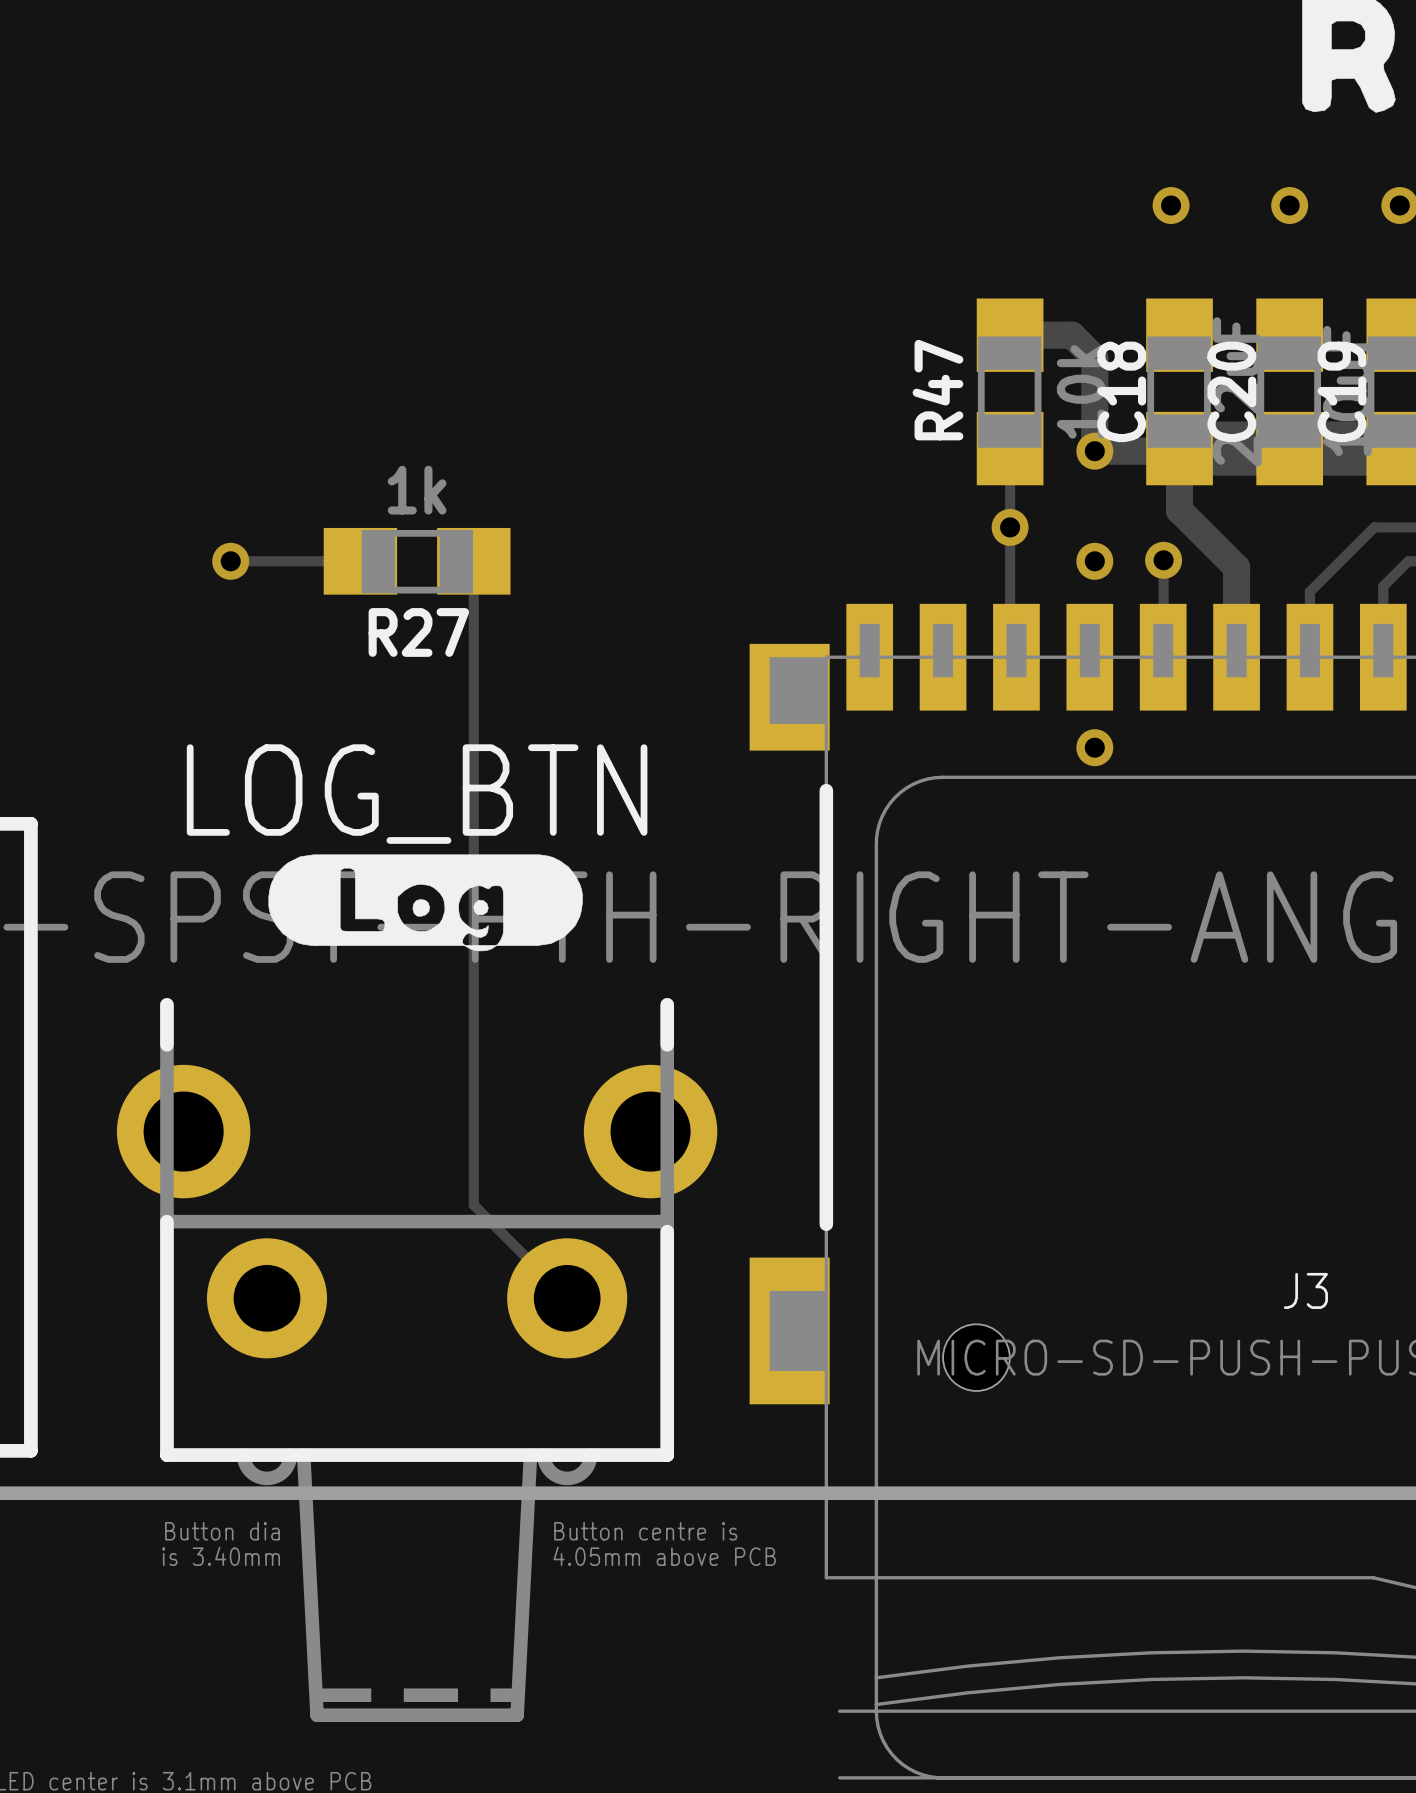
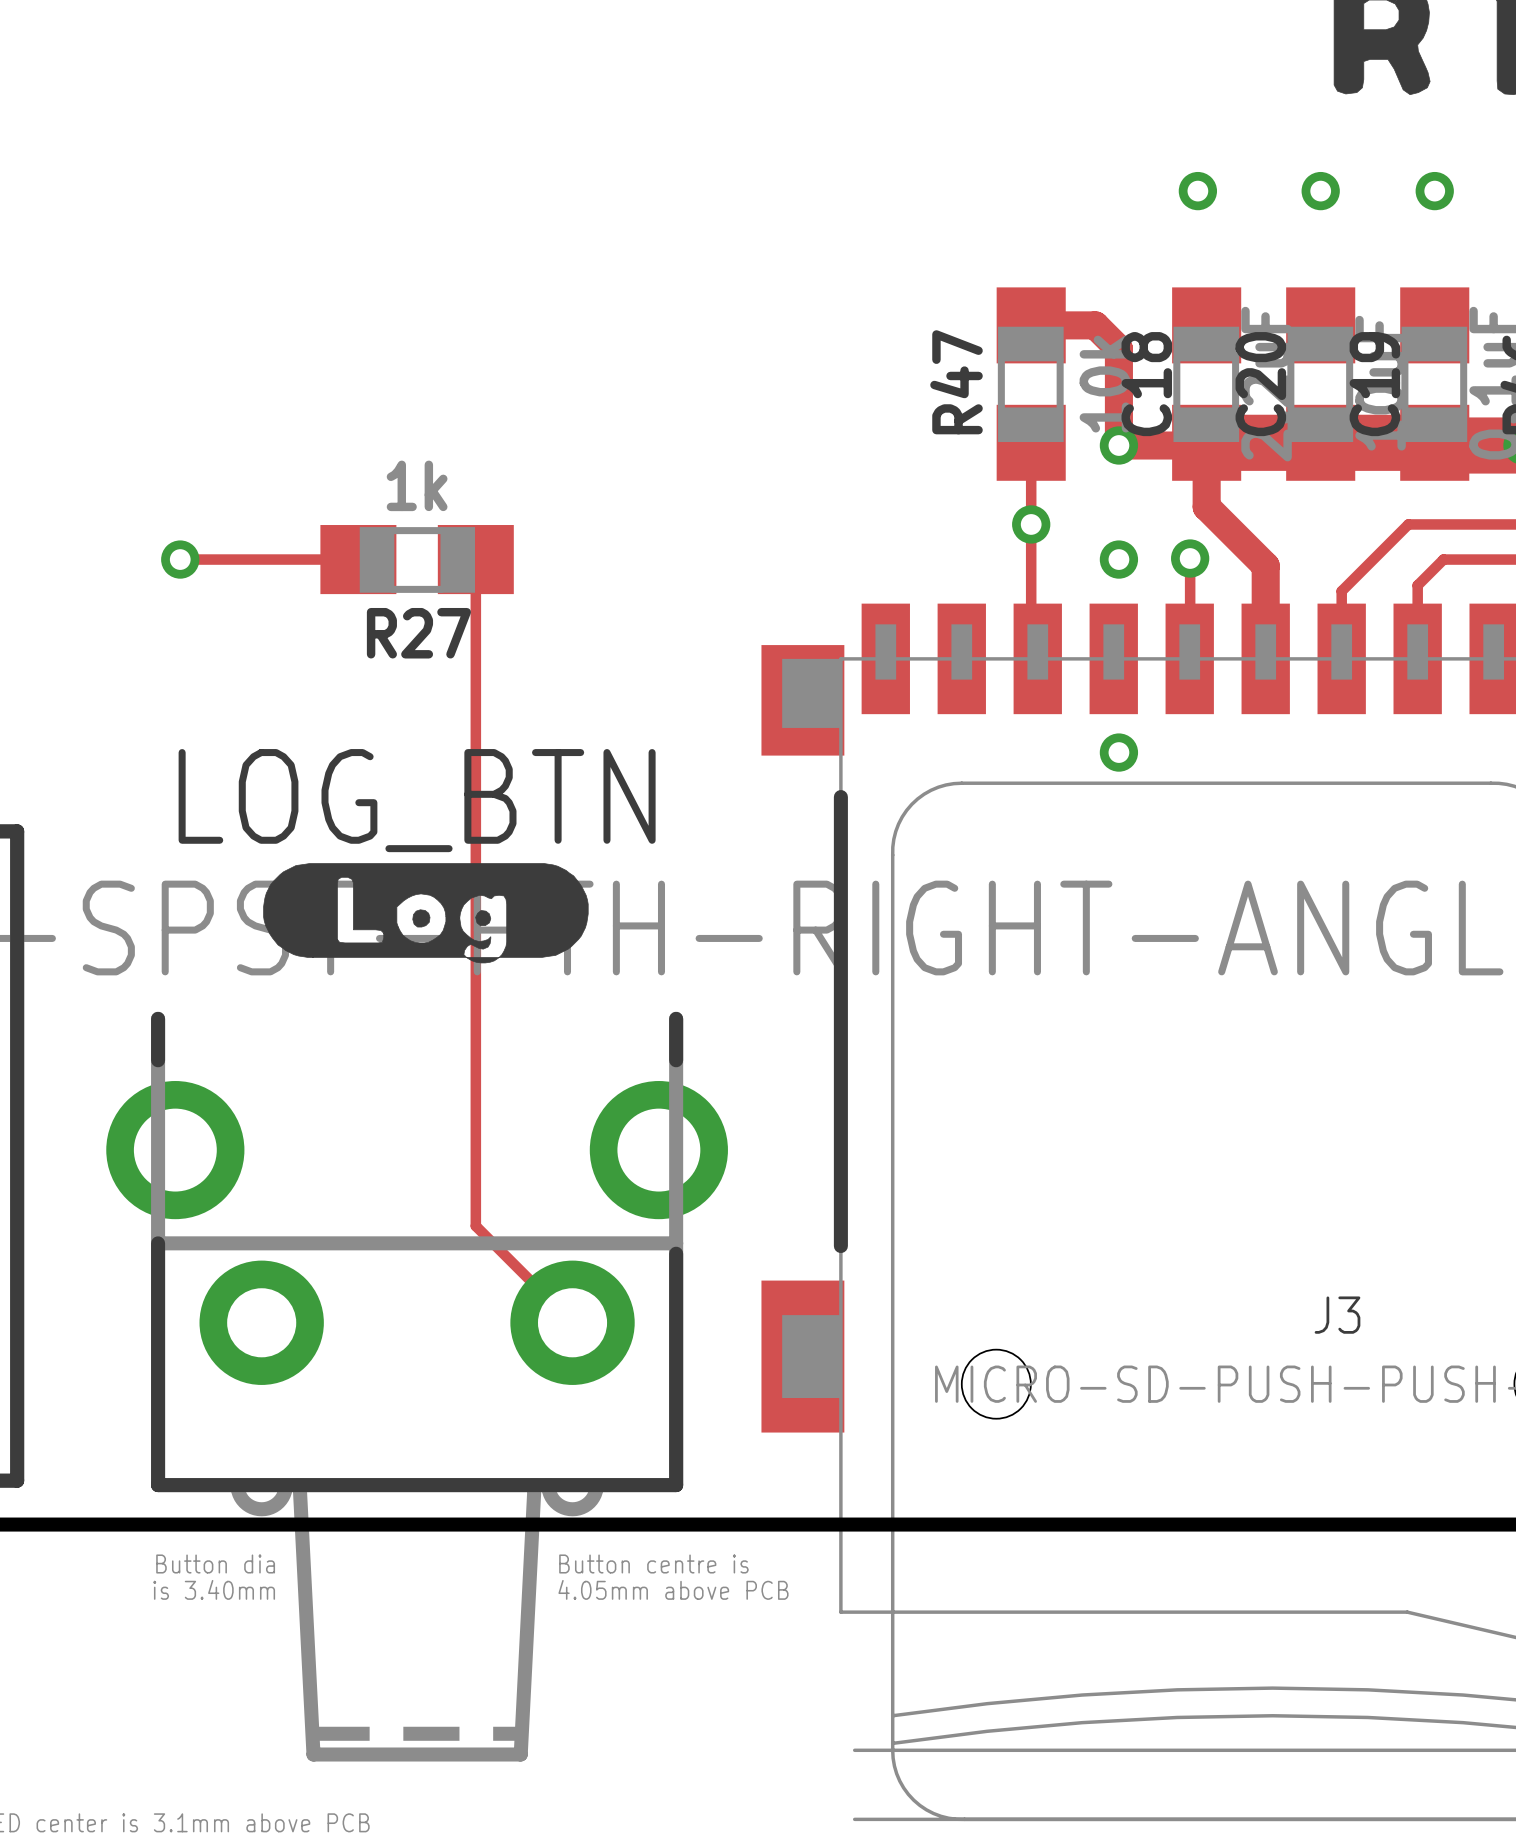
track: none -> (180, 559) (224, 559)
via position: (230, 561) -> (180, 559)

